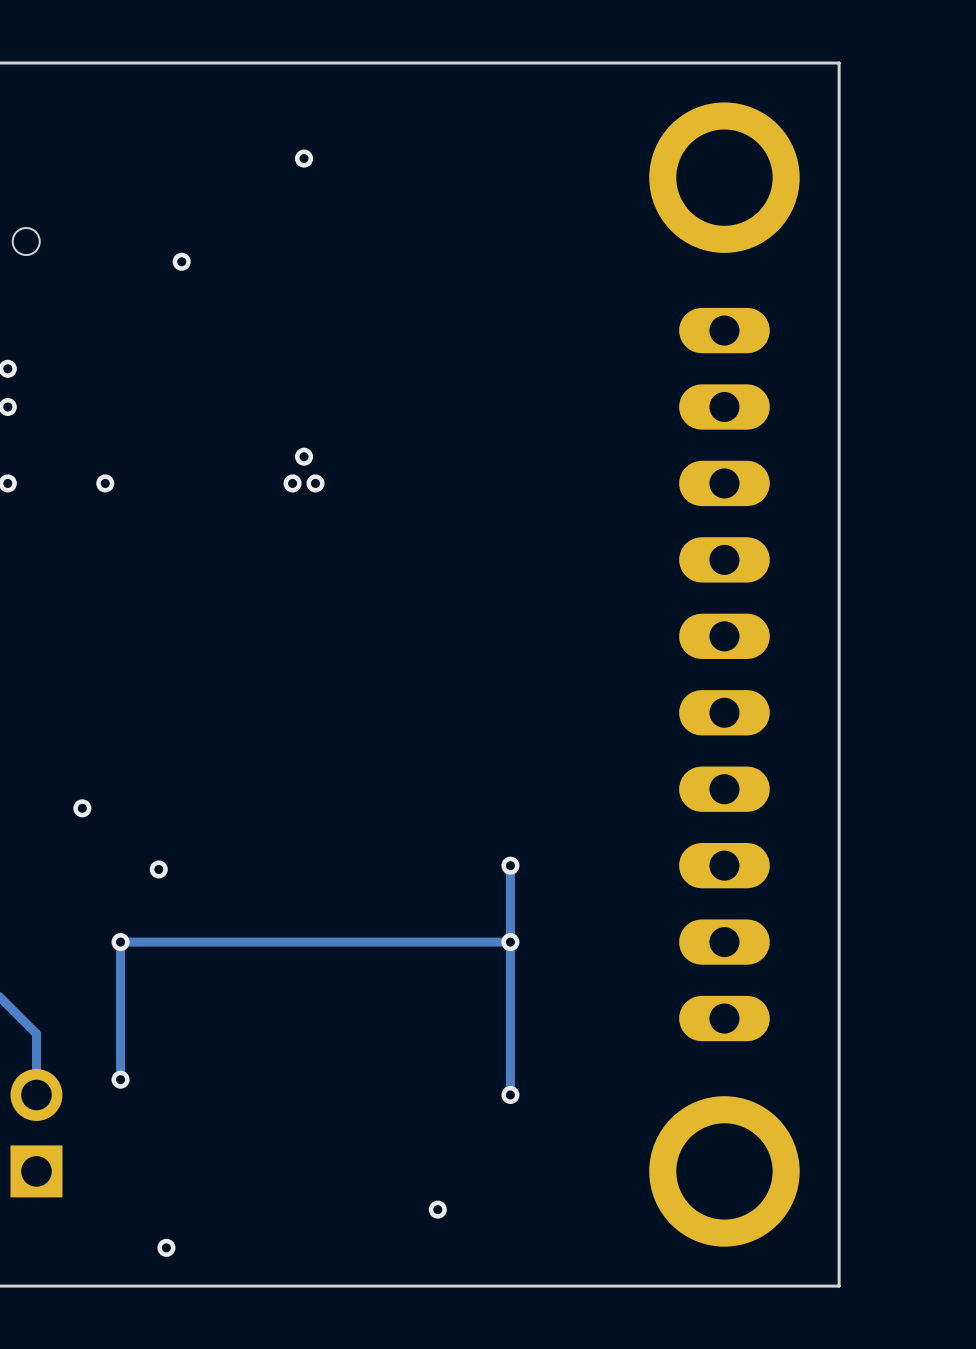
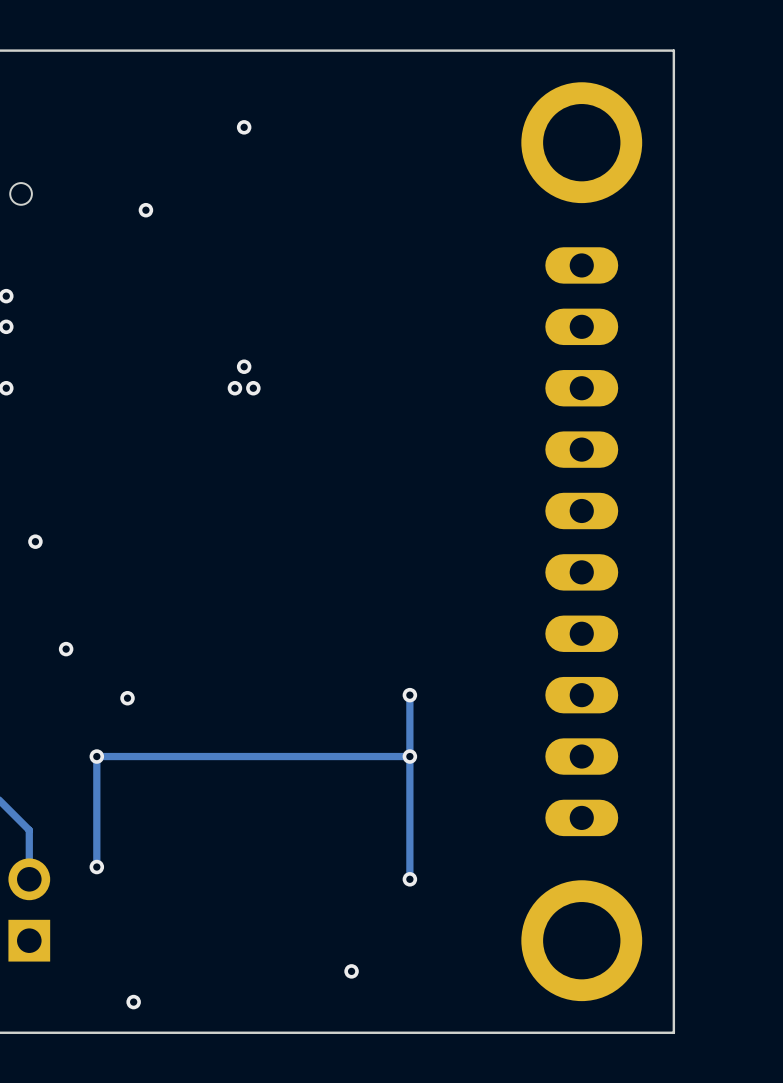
via: (105, 483) -> none
via: none -> (35, 541)

